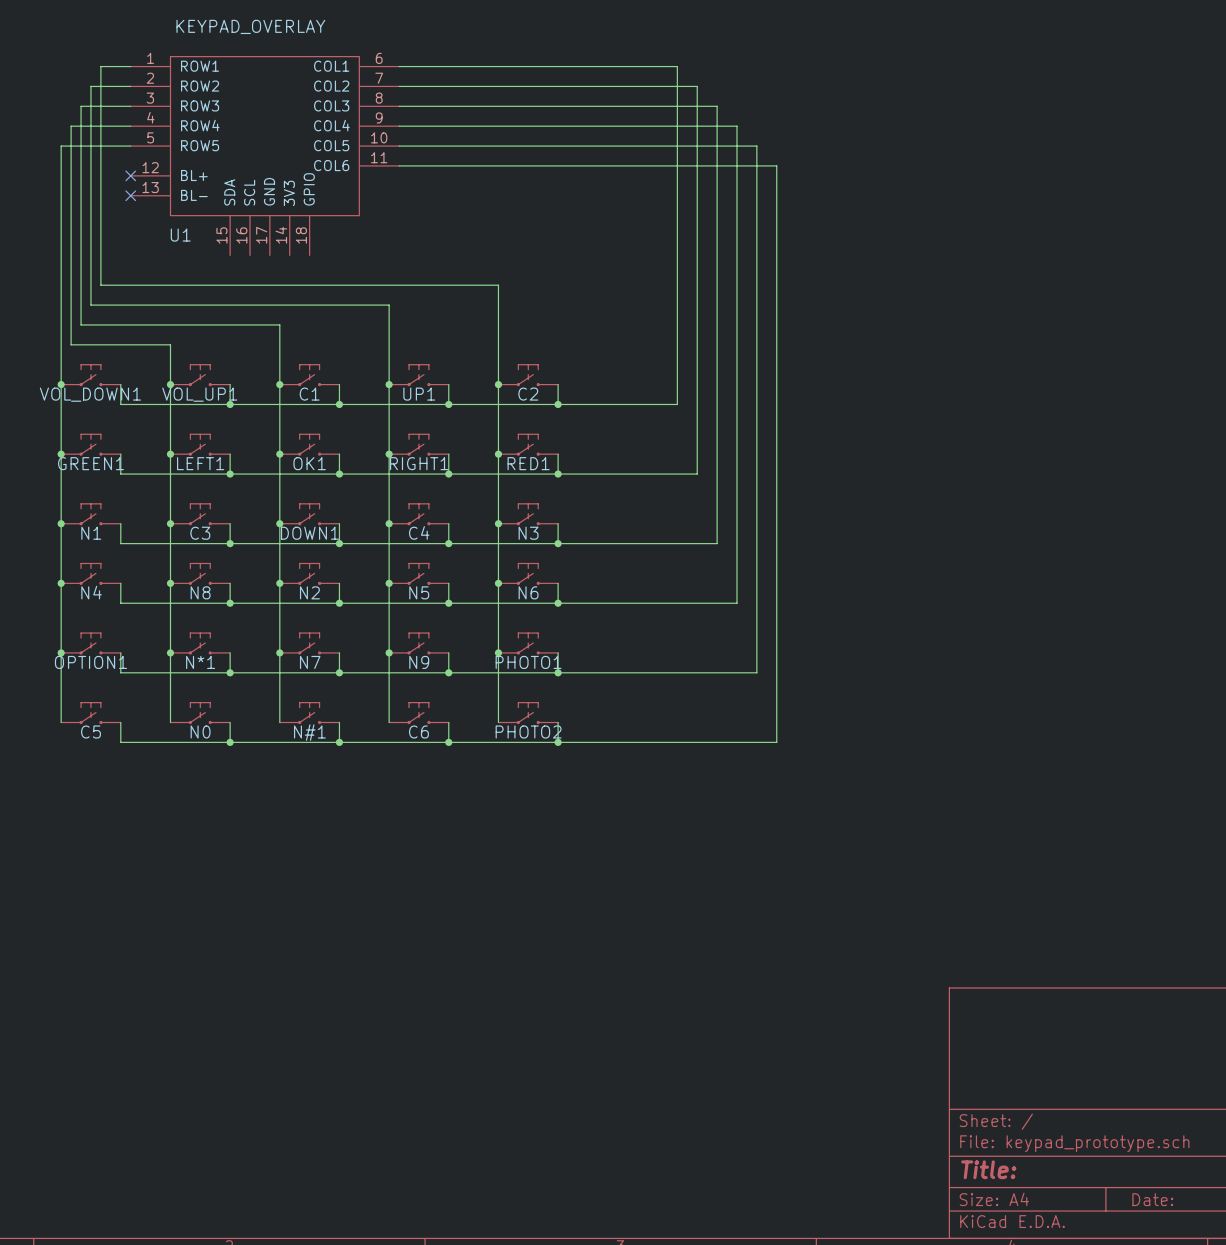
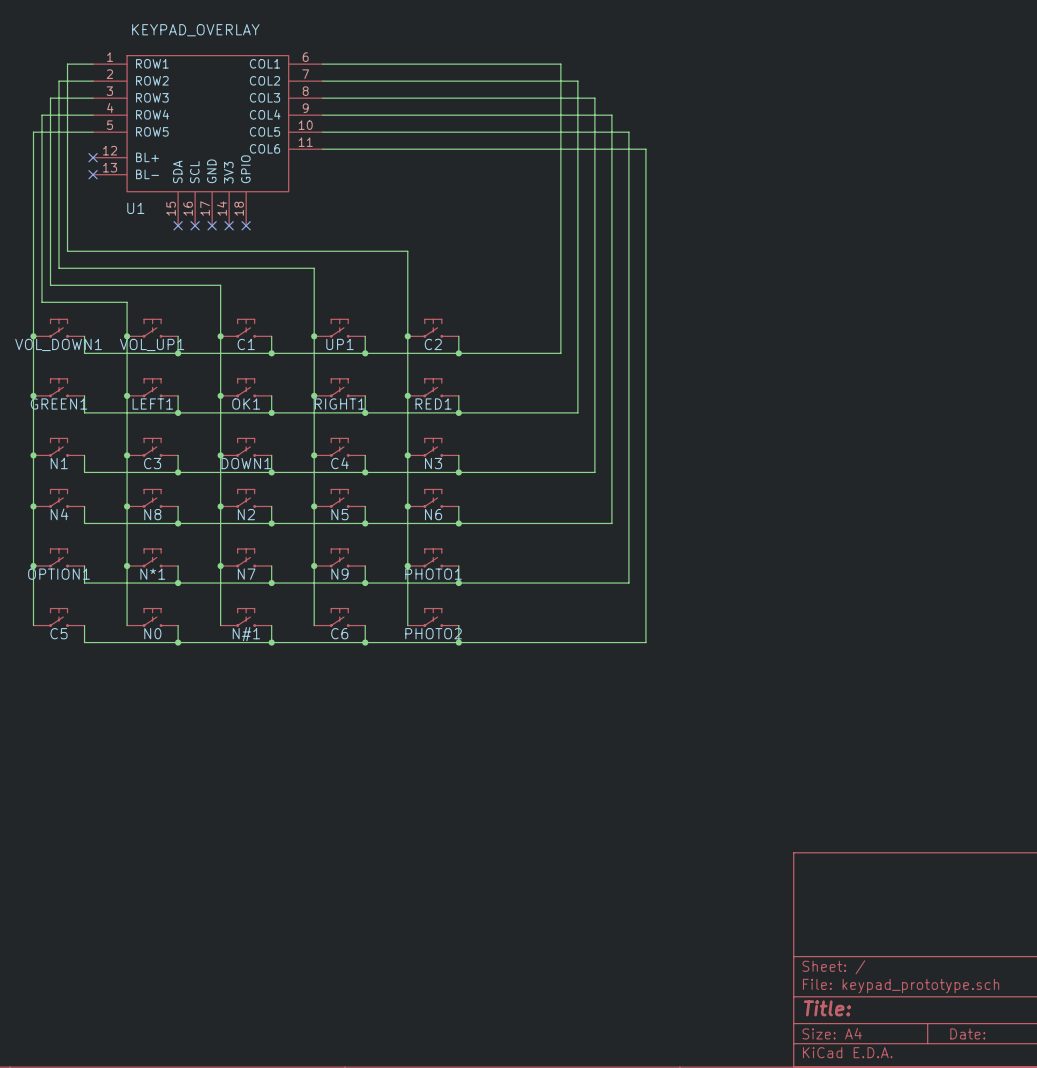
no-connect mark: none -> (178, 225)
no-connect mark: none -> (195, 225)
no-connect mark: none -> (212, 225)
no-connect mark: none -> (229, 225)
no-connect mark: none -> (246, 225)

